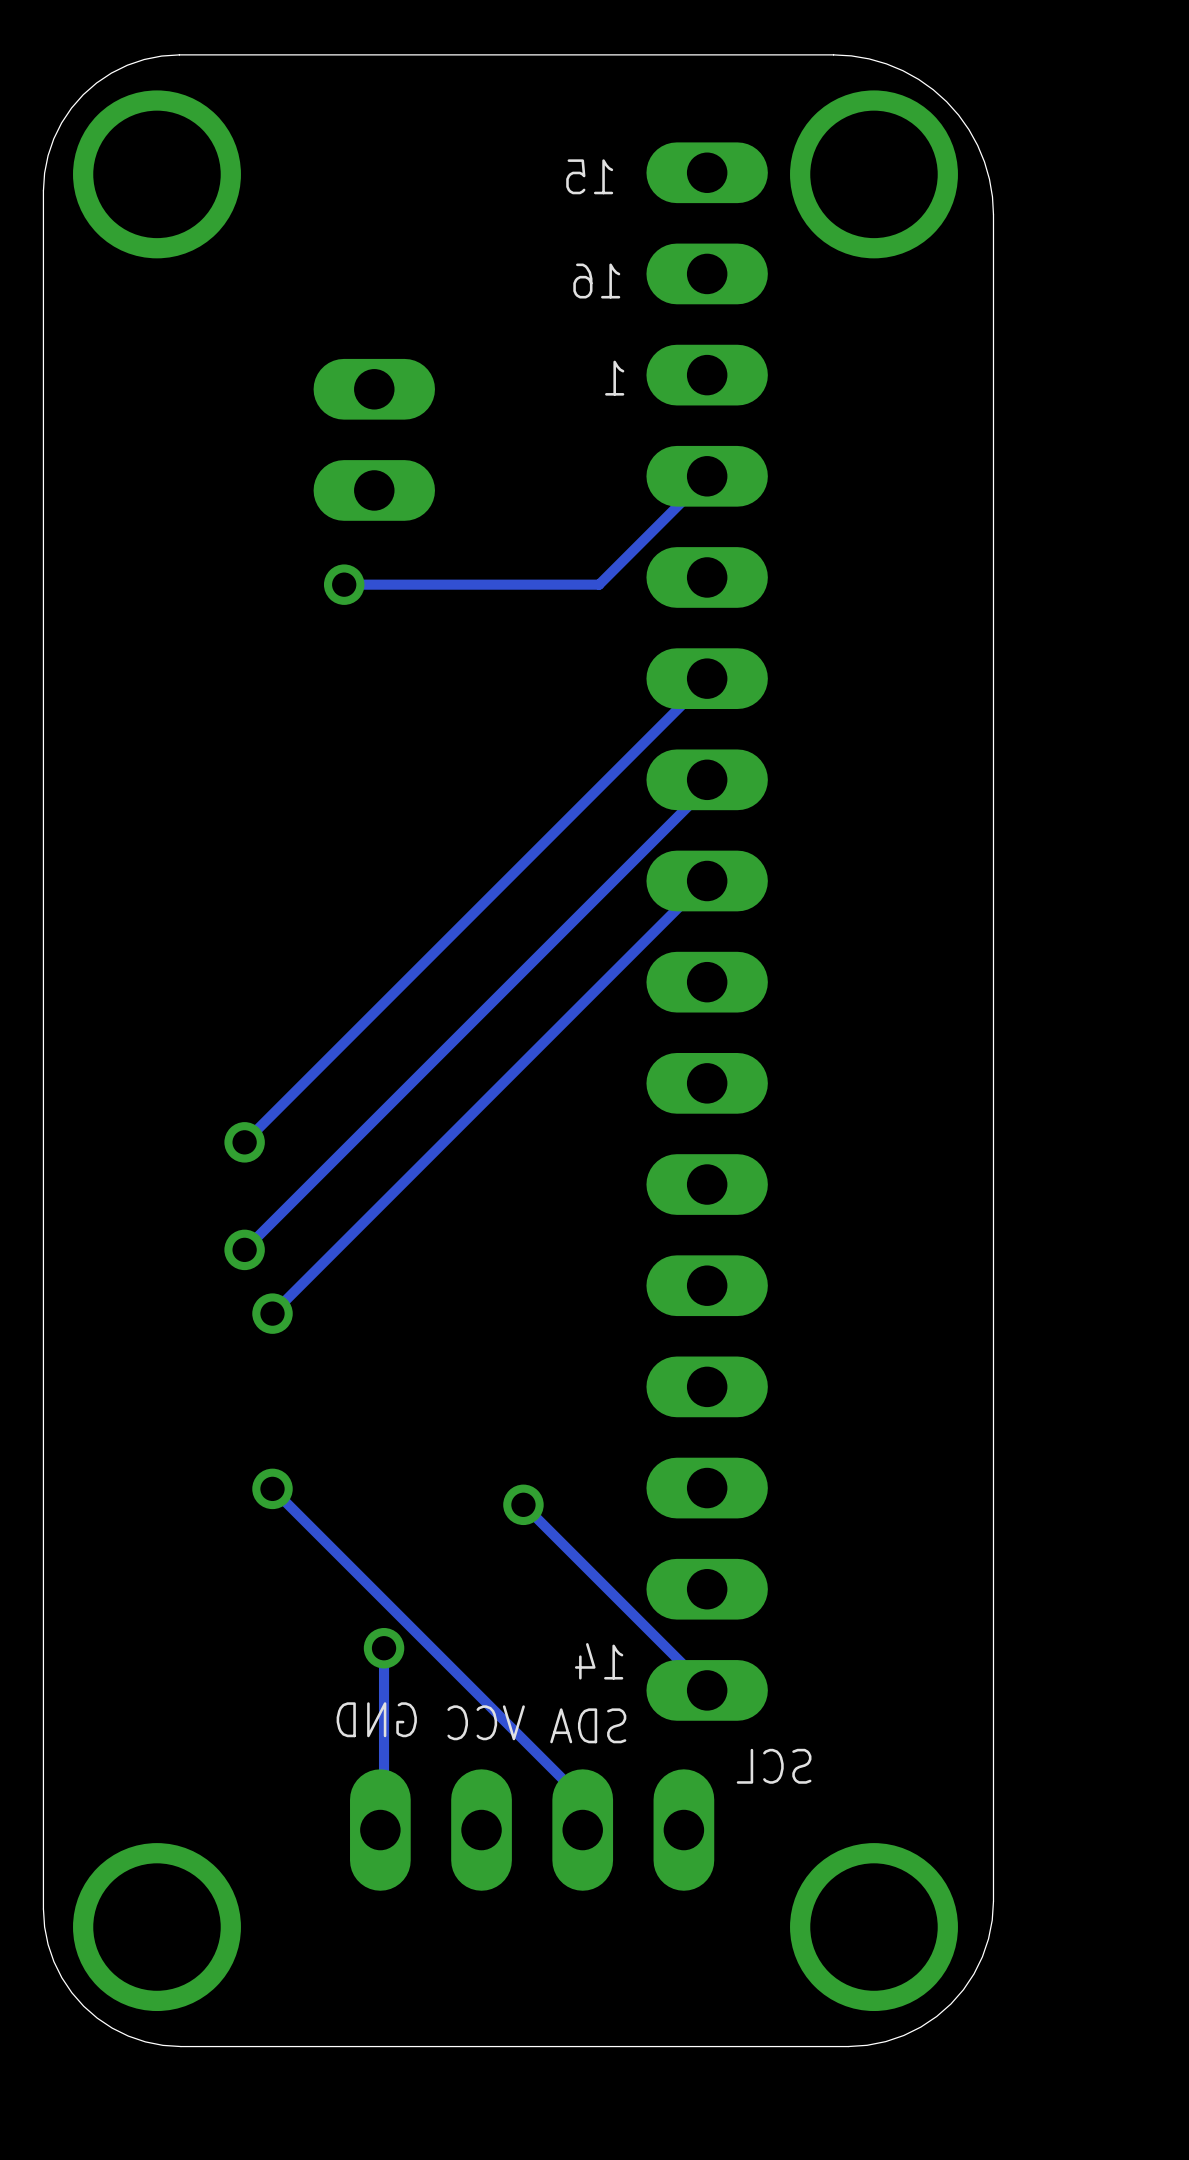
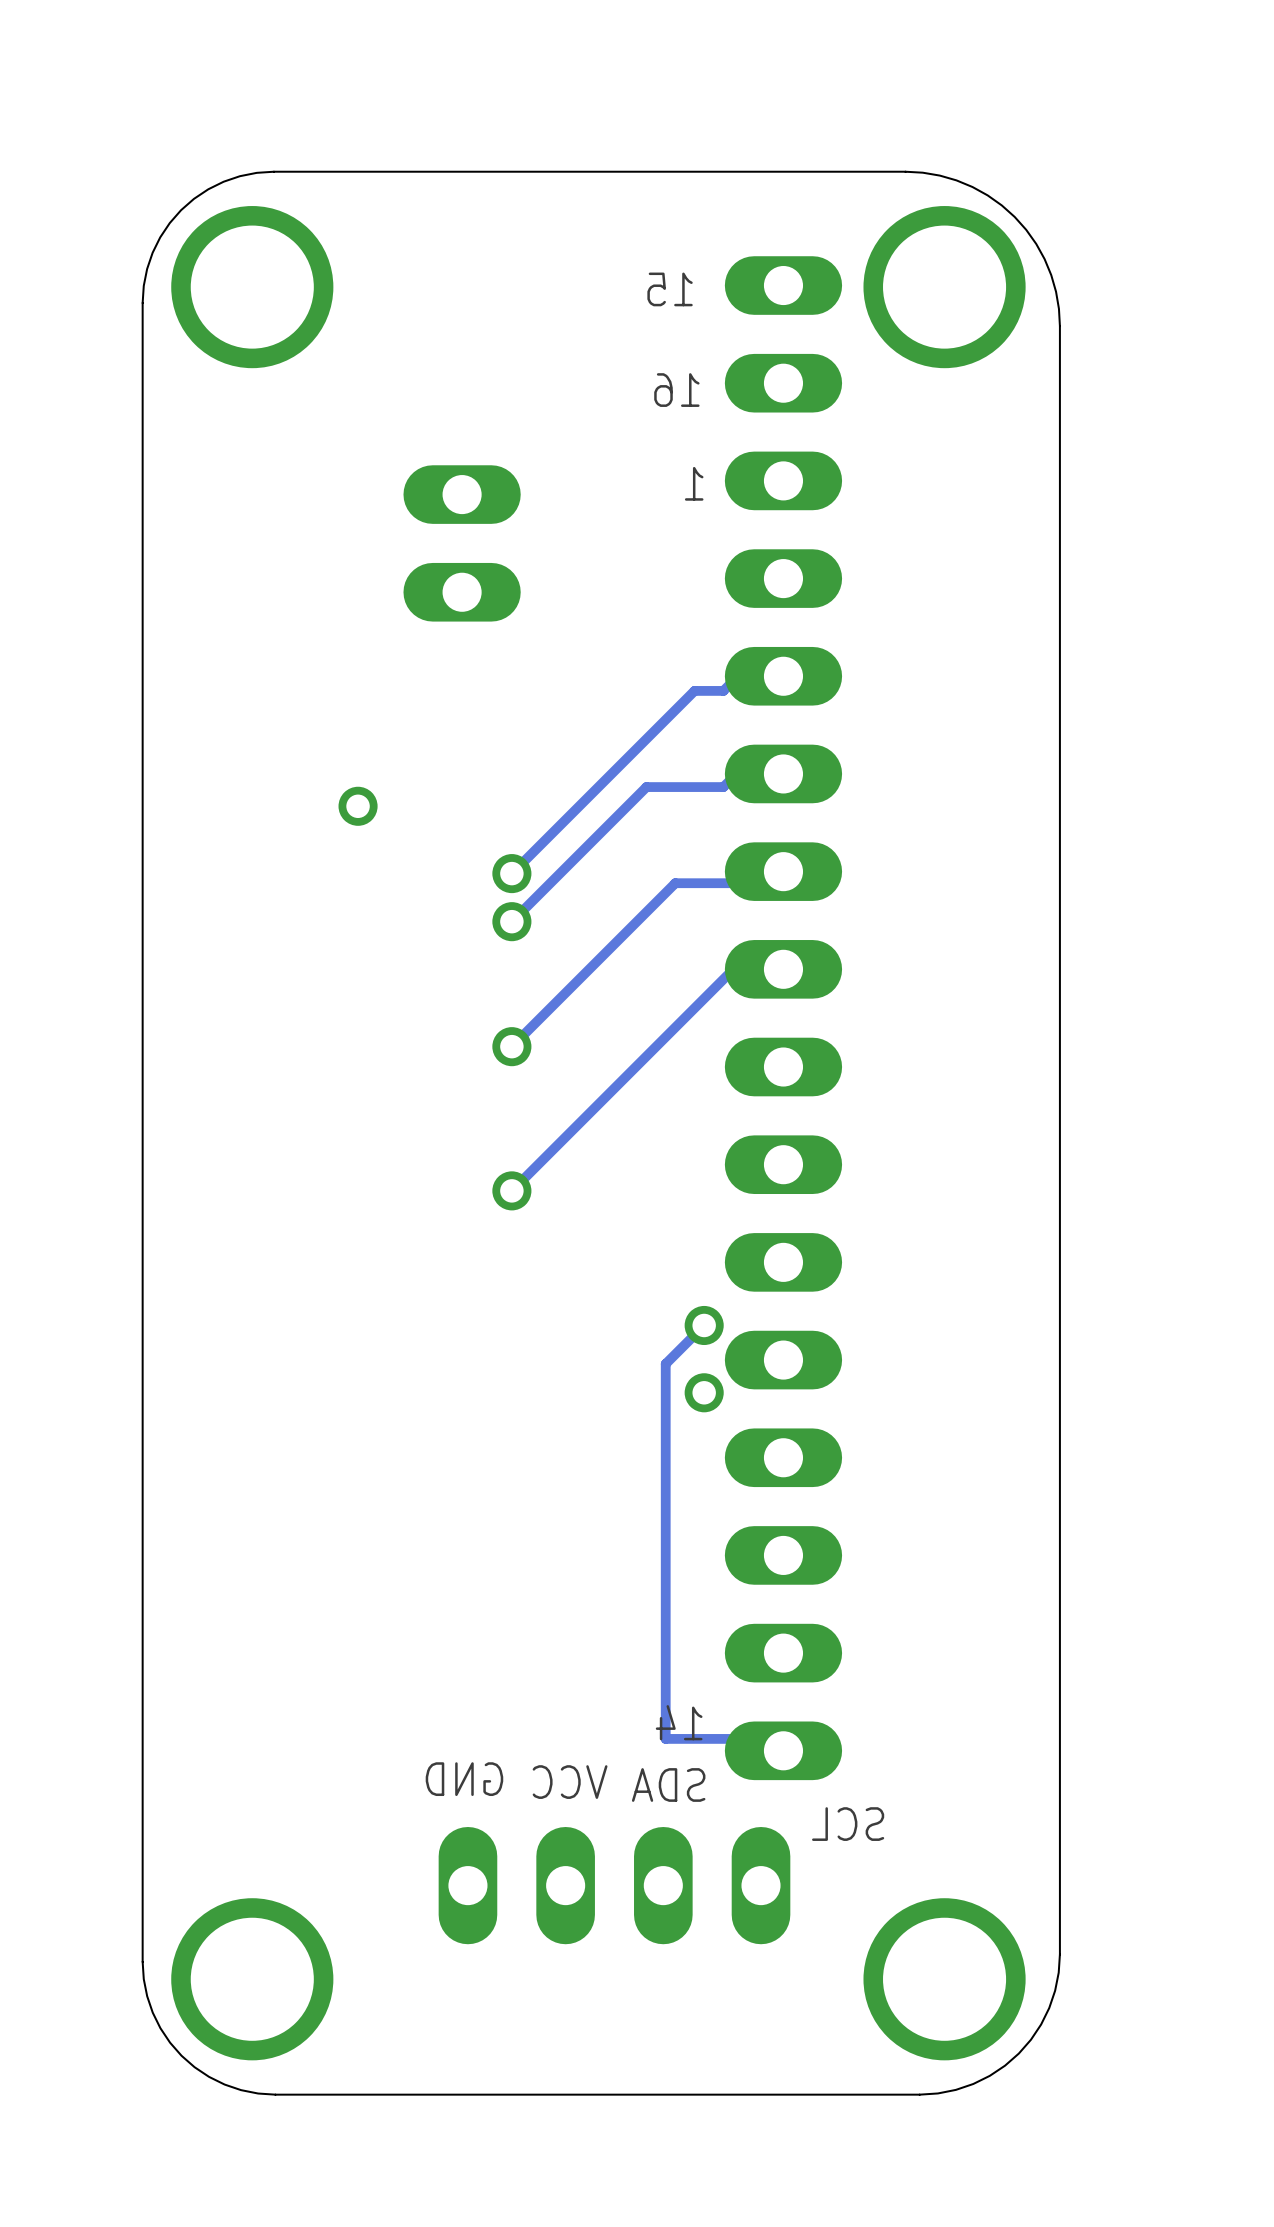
track: (707, 476) (599, 584) (344, 584) -> none
track: none -> (783, 676) (781, 681) (733, 681) (723, 690) (694, 690) (511, 873)
via: (344, 584) -> none
track: (707, 678) (595, 791) -> (783, 871) (771, 883) (675, 883)
track: none -> (783, 773) (781, 777) (733, 777) (723, 787) (646, 787) (511, 921)
via: none -> (358, 806)
track: (706, 779) (706, 787) (244, 1249) -> none
via: none -> (511, 873)
via: none -> (511, 921)
track: (707, 880) (272, 1313) -> (783, 969) (733, 969) (511, 1190)
track: (425, 961) (244, 1142) -> none
via: none -> (511, 1046)
via: none -> (511, 1190)
via: (244, 1142) -> none
via: (244, 1249) -> none
via: none -> (704, 1325)
via: (272, 1313) -> none
via: none -> (704, 1392)
track: (272, 1488) (579, 1795) (579, 1827) (582, 1830) -> none
via: (272, 1488) -> none
track: (523, 1504) (707, 1690) -> (704, 1325) (665, 1363) (665, 1738) (771, 1738) (783, 1750)
via: (523, 1504) -> none
track: (384, 1648) (384, 1827) (380, 1830) -> none
via: (384, 1648) -> none

